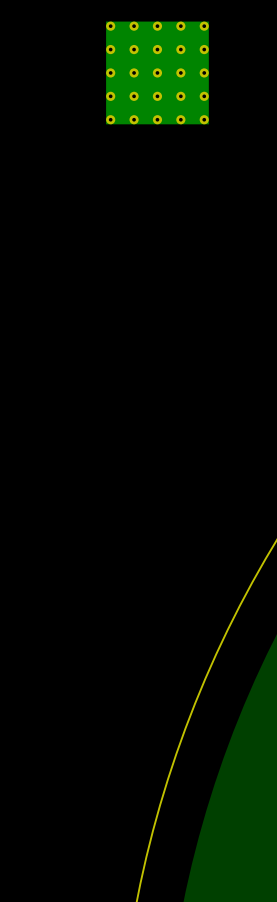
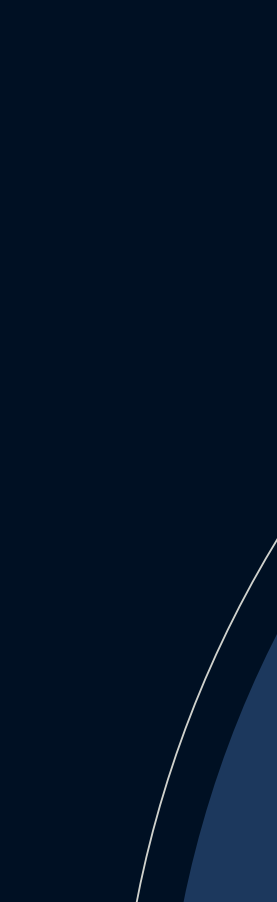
part: (157, 72) -> none

